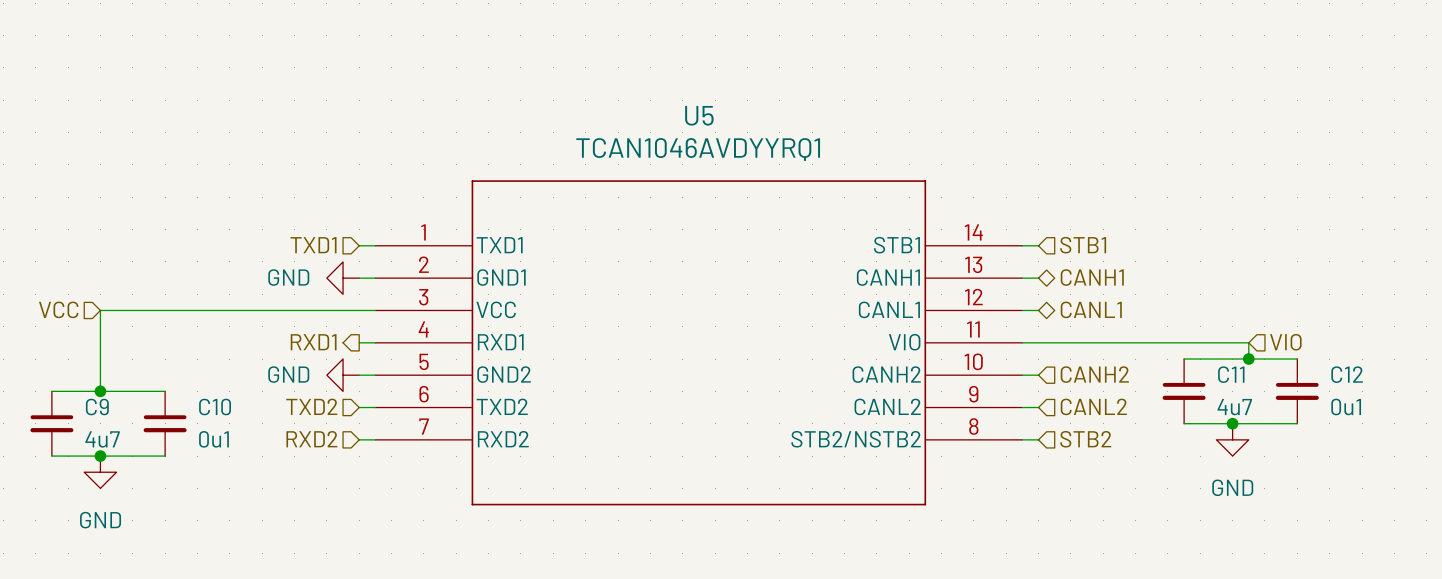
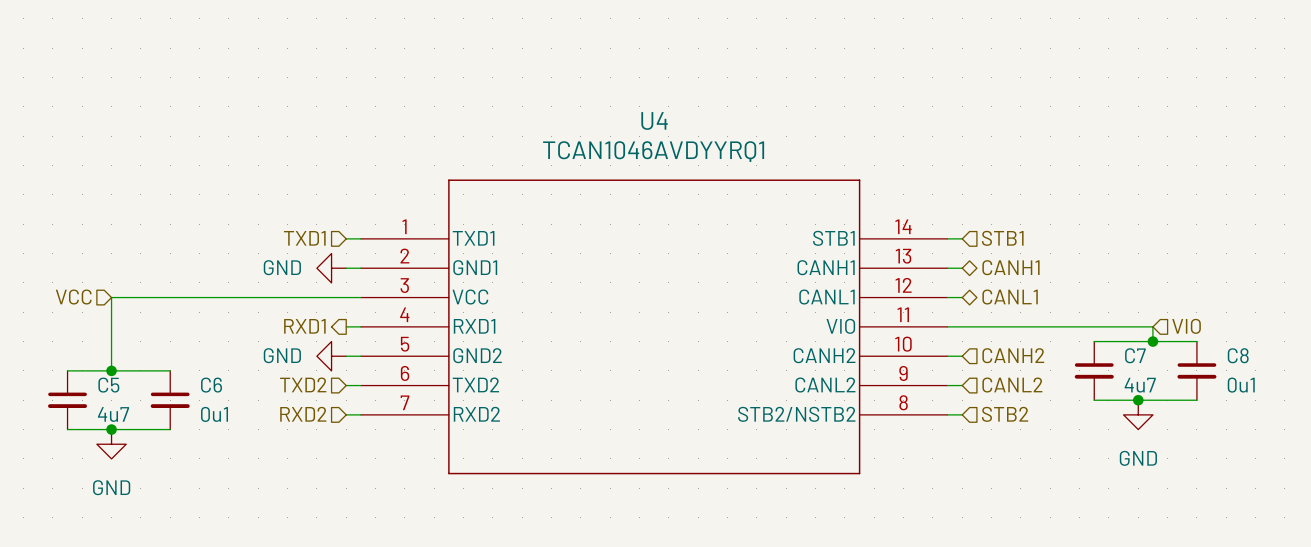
U5 name: U5 (699, 115) -> U4 (654, 120)
C11 name: C11 (1231, 374) -> C7 (1135, 355)
C12 name: C12 (1347, 374) -> C8 (1238, 355)
C9 name: C9 (97, 407) -> C5 (108, 385)
C10 name: C10 (215, 407) -> C6 (211, 385)

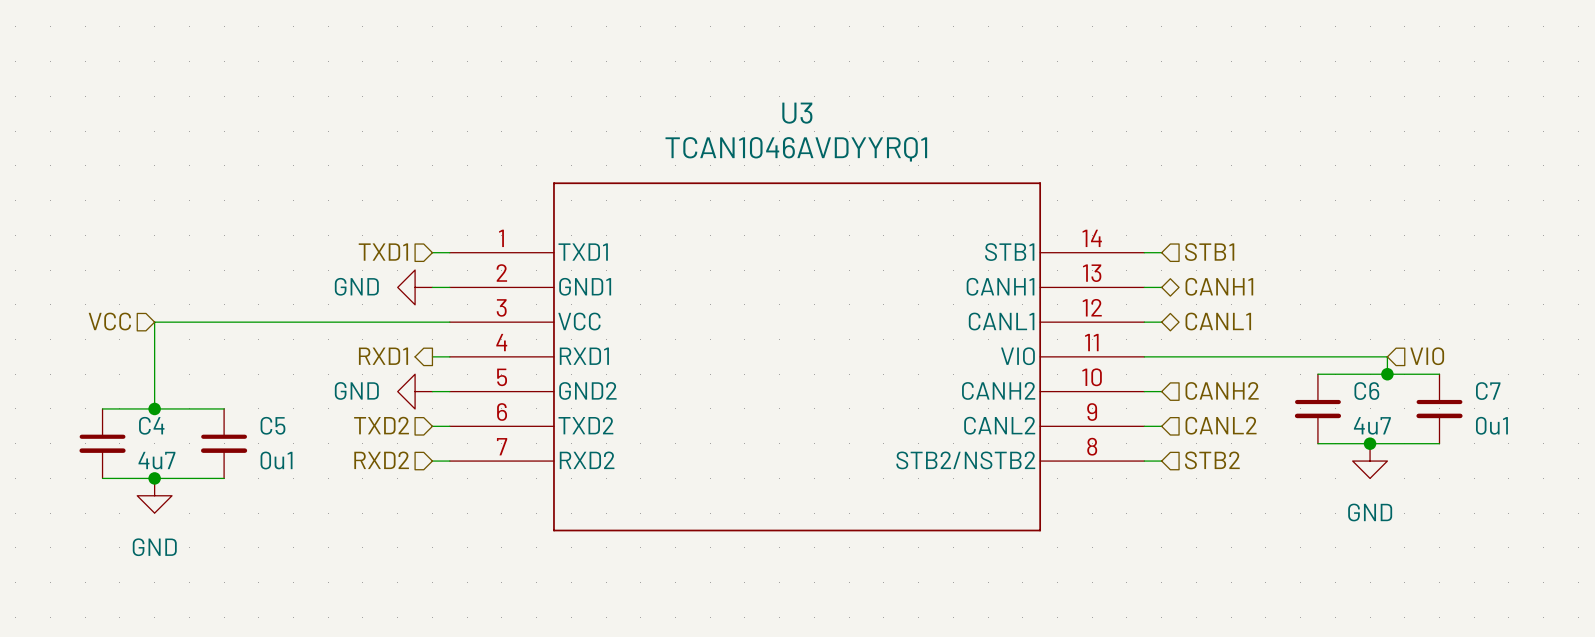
U4 name: U4 (654, 120) -> U3 (797, 113)
C7 name: C7 (1135, 355) -> C6 (1366, 391)
C8 name: C8 (1238, 355) -> C7 (1488, 391)
C5 name: C5 (108, 385) -> C4 (151, 425)
C6 name: C6 (211, 385) -> C5 (272, 425)

